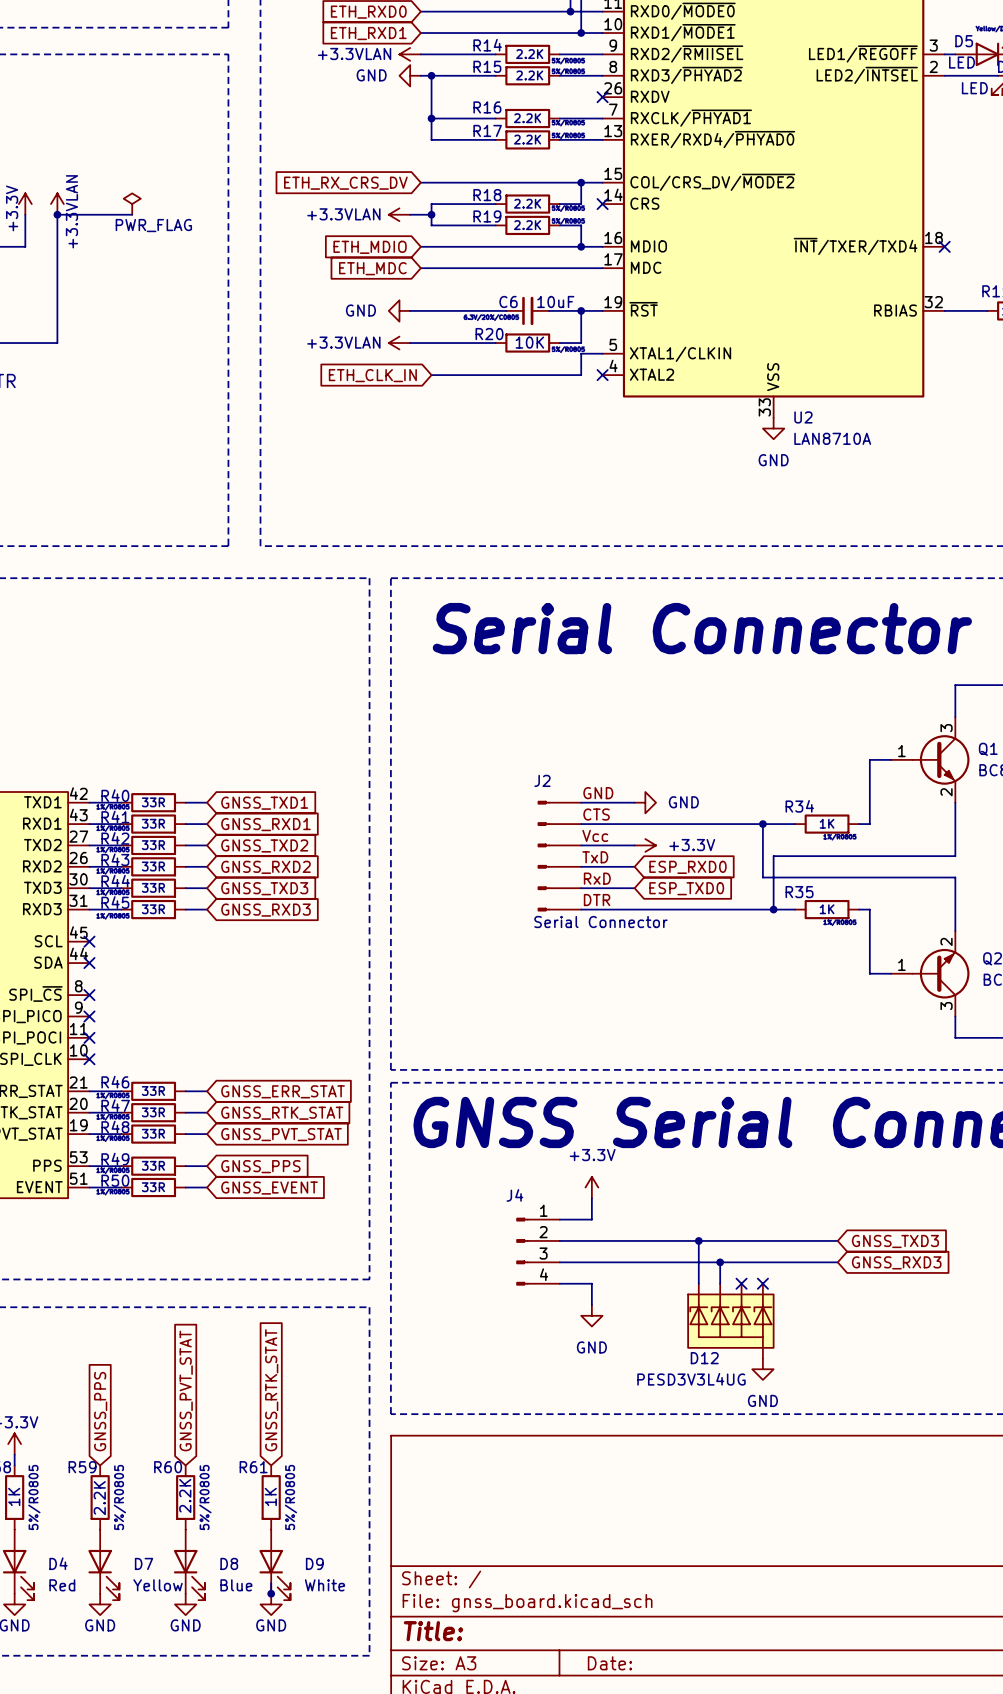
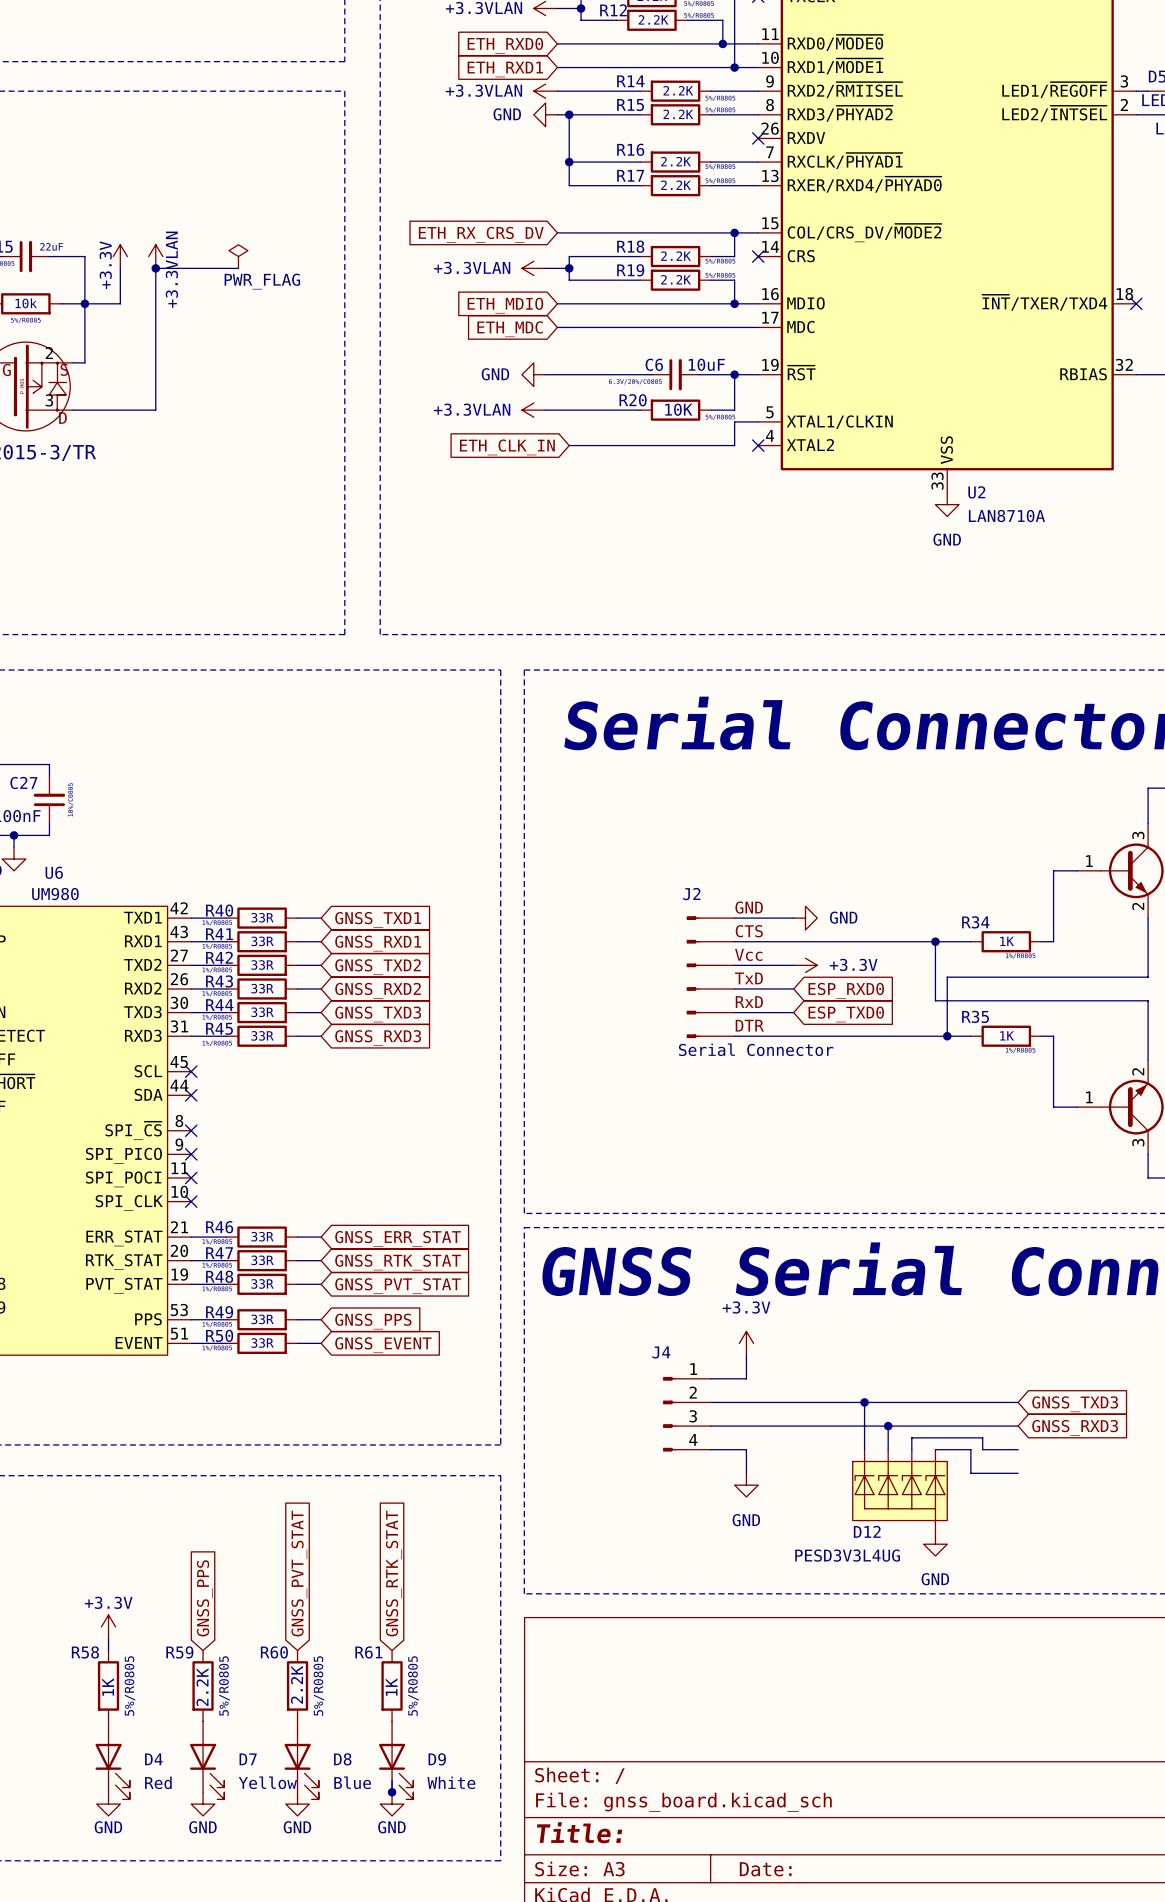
wire: none -> (911, 1449) (911, 1437) (982, 1437) (982, 1449) (1018, 1449)
no-connect mark: (741, 1283) -> none
wire: none -> (935, 1449) (970, 1449) (970, 1473) (1018, 1473)
no-connect mark: (762, 1283) -> none

